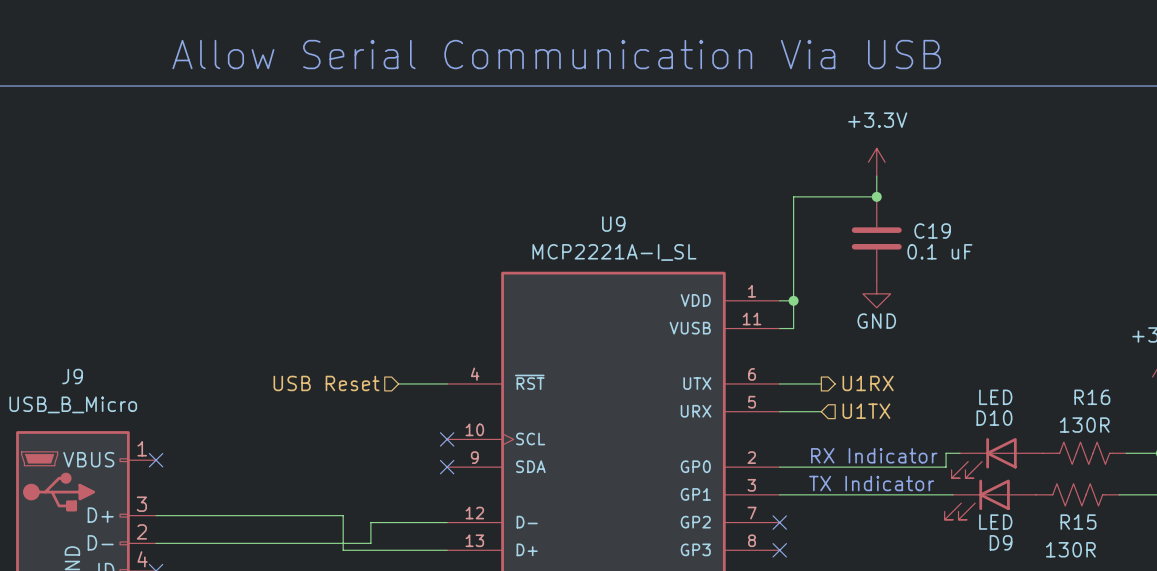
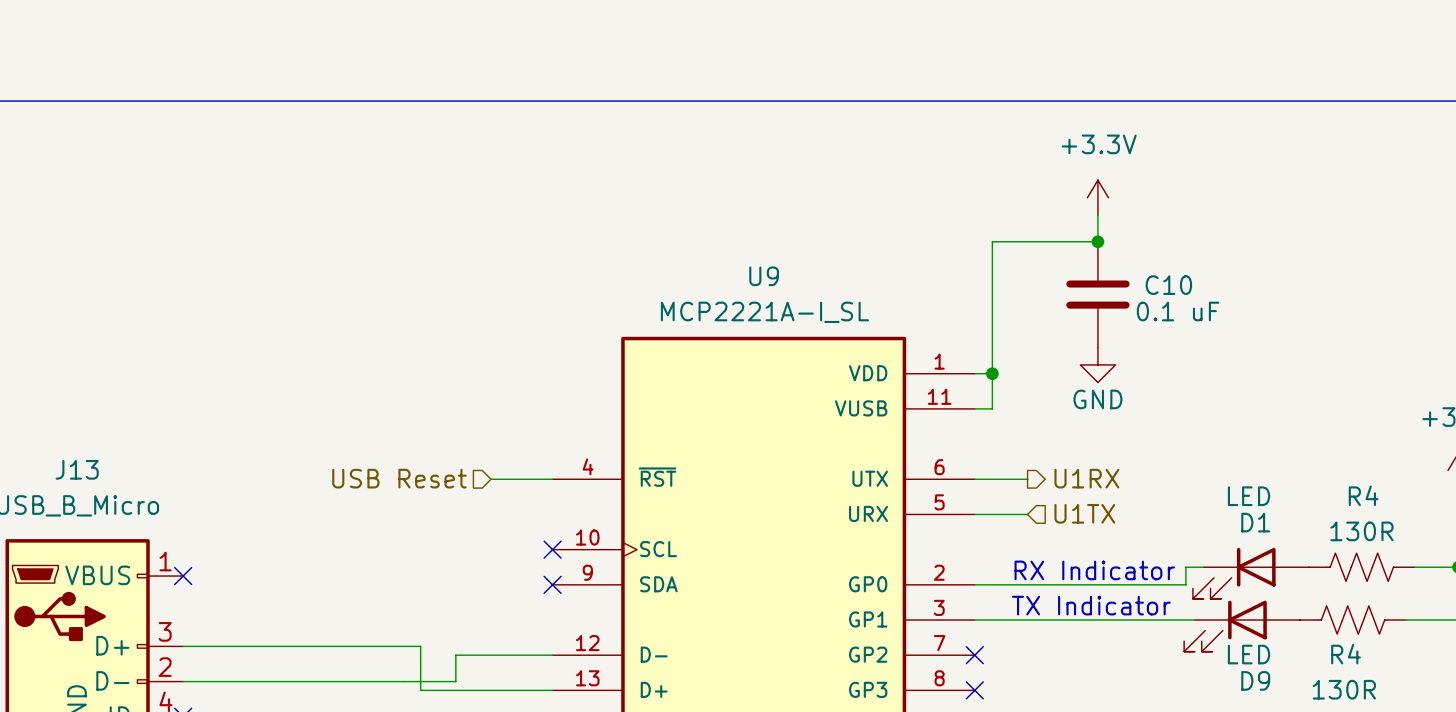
text: Allow Serial Communication Via USB (556, 54) -> none
C19 name: C19 (932, 231) -> C10 (1168, 285)
J9 name: J9 (72, 376) -> J13 (77, 469)
R16 name: R16 (1092, 397) -> R4 (1363, 495)
D10 name: D10 (994, 418) -> D1 (1255, 522)
R15 name: R15 (1078, 522) -> R4 (1346, 654)

